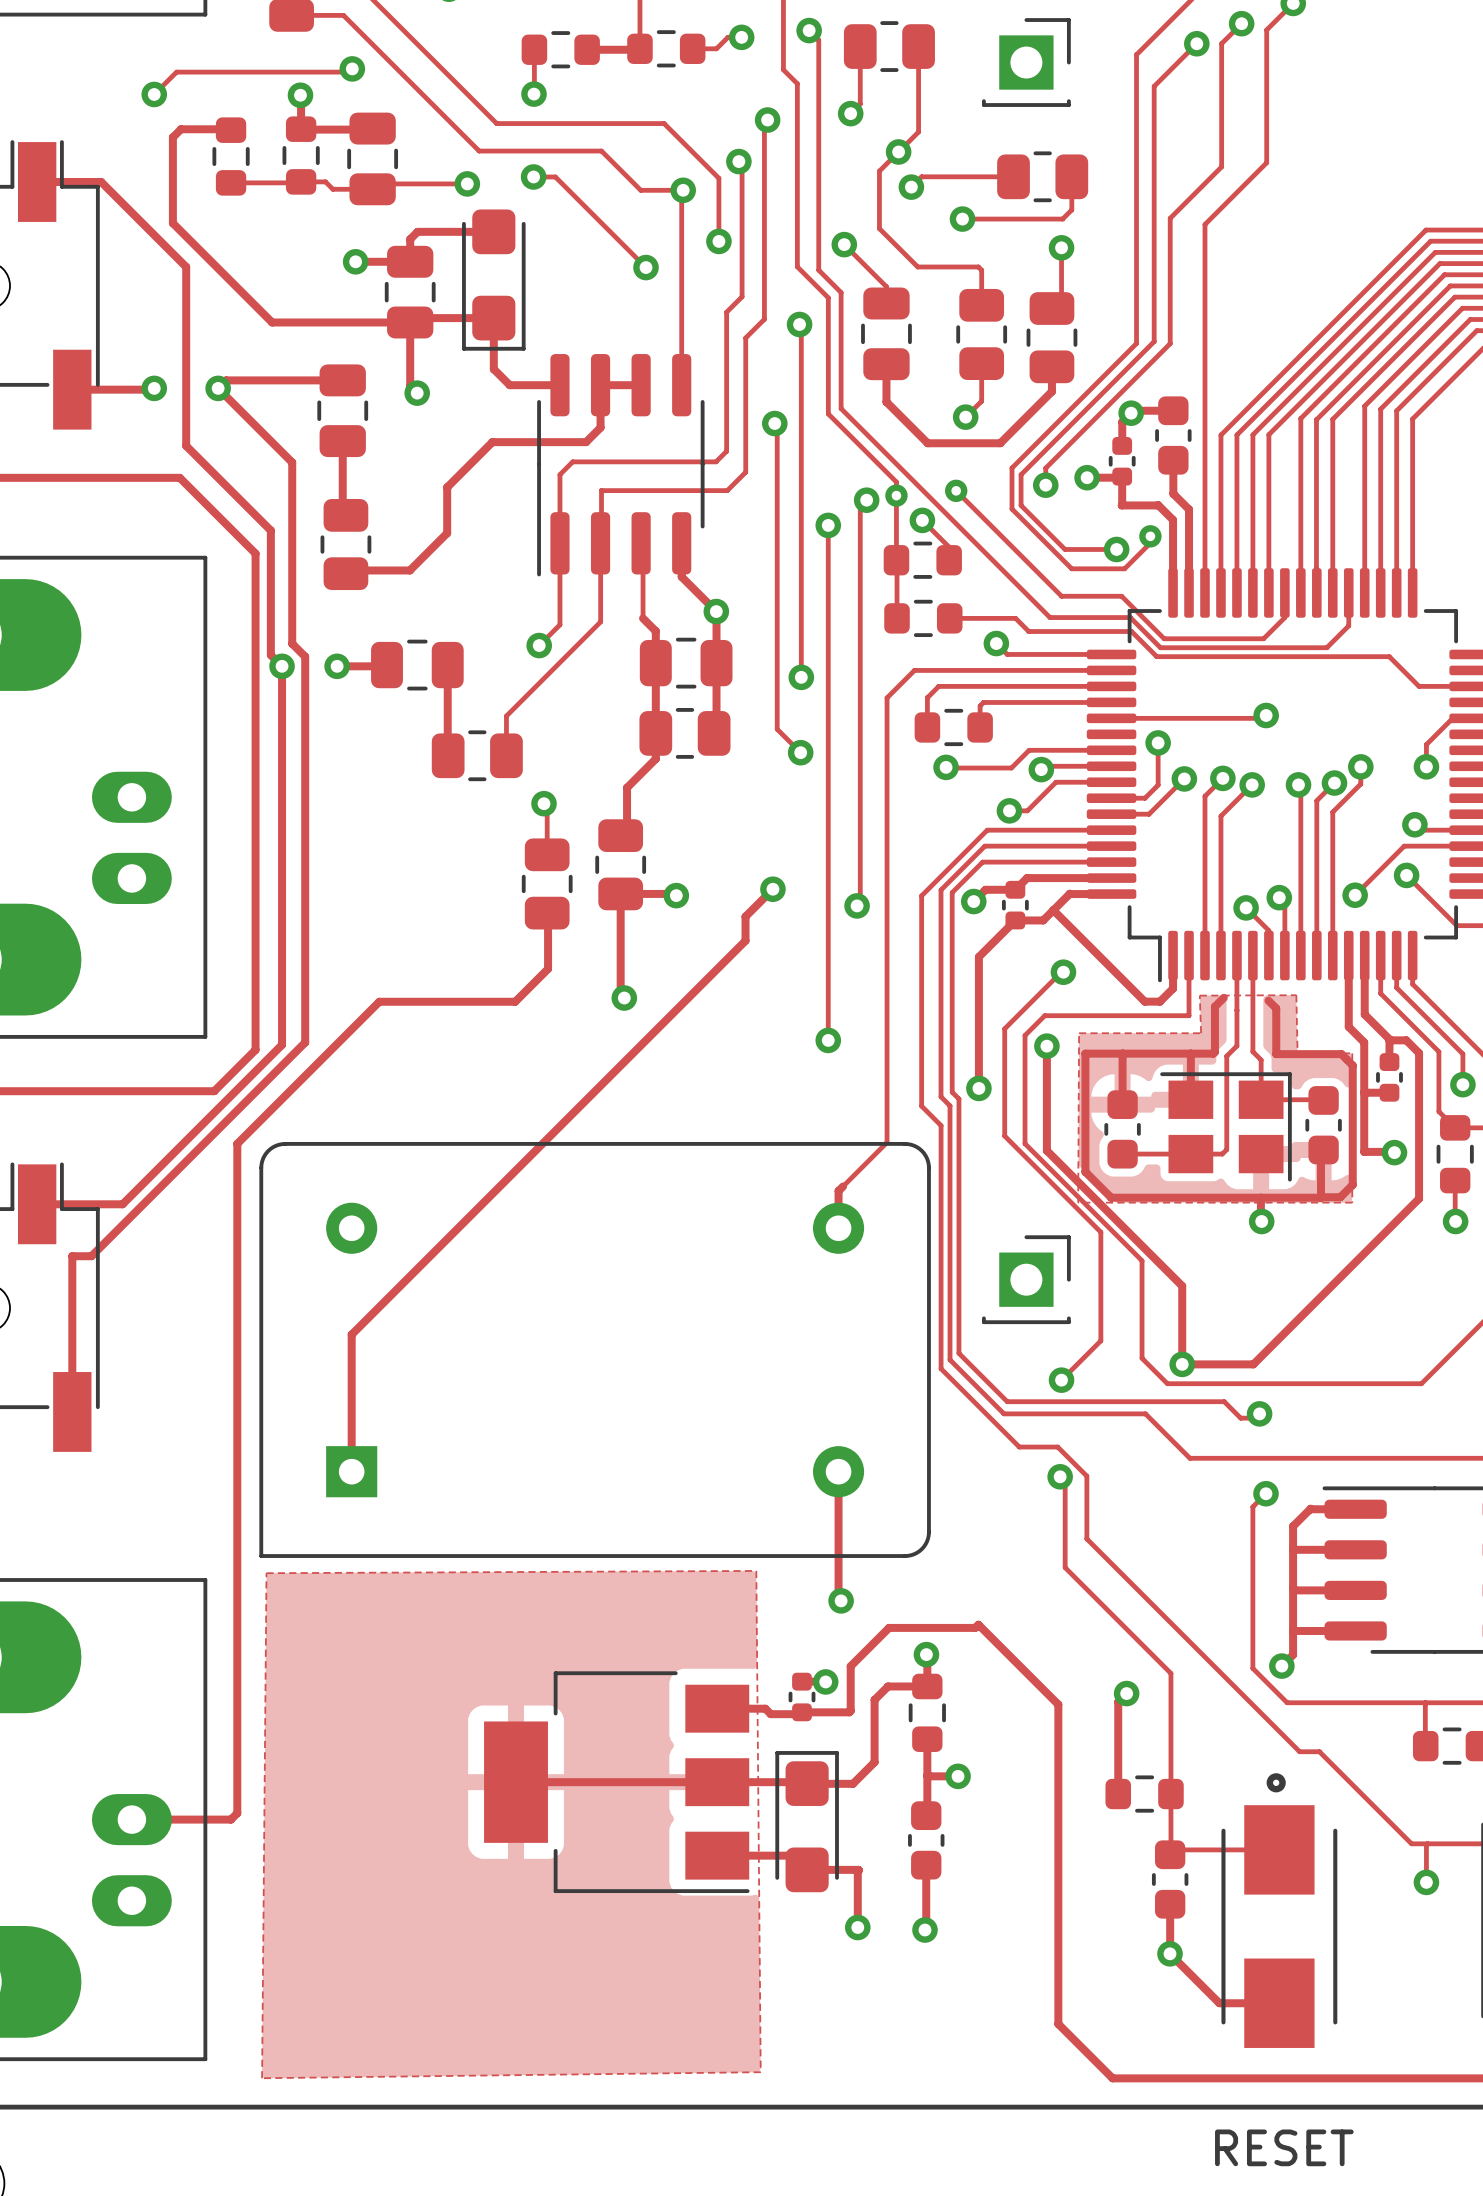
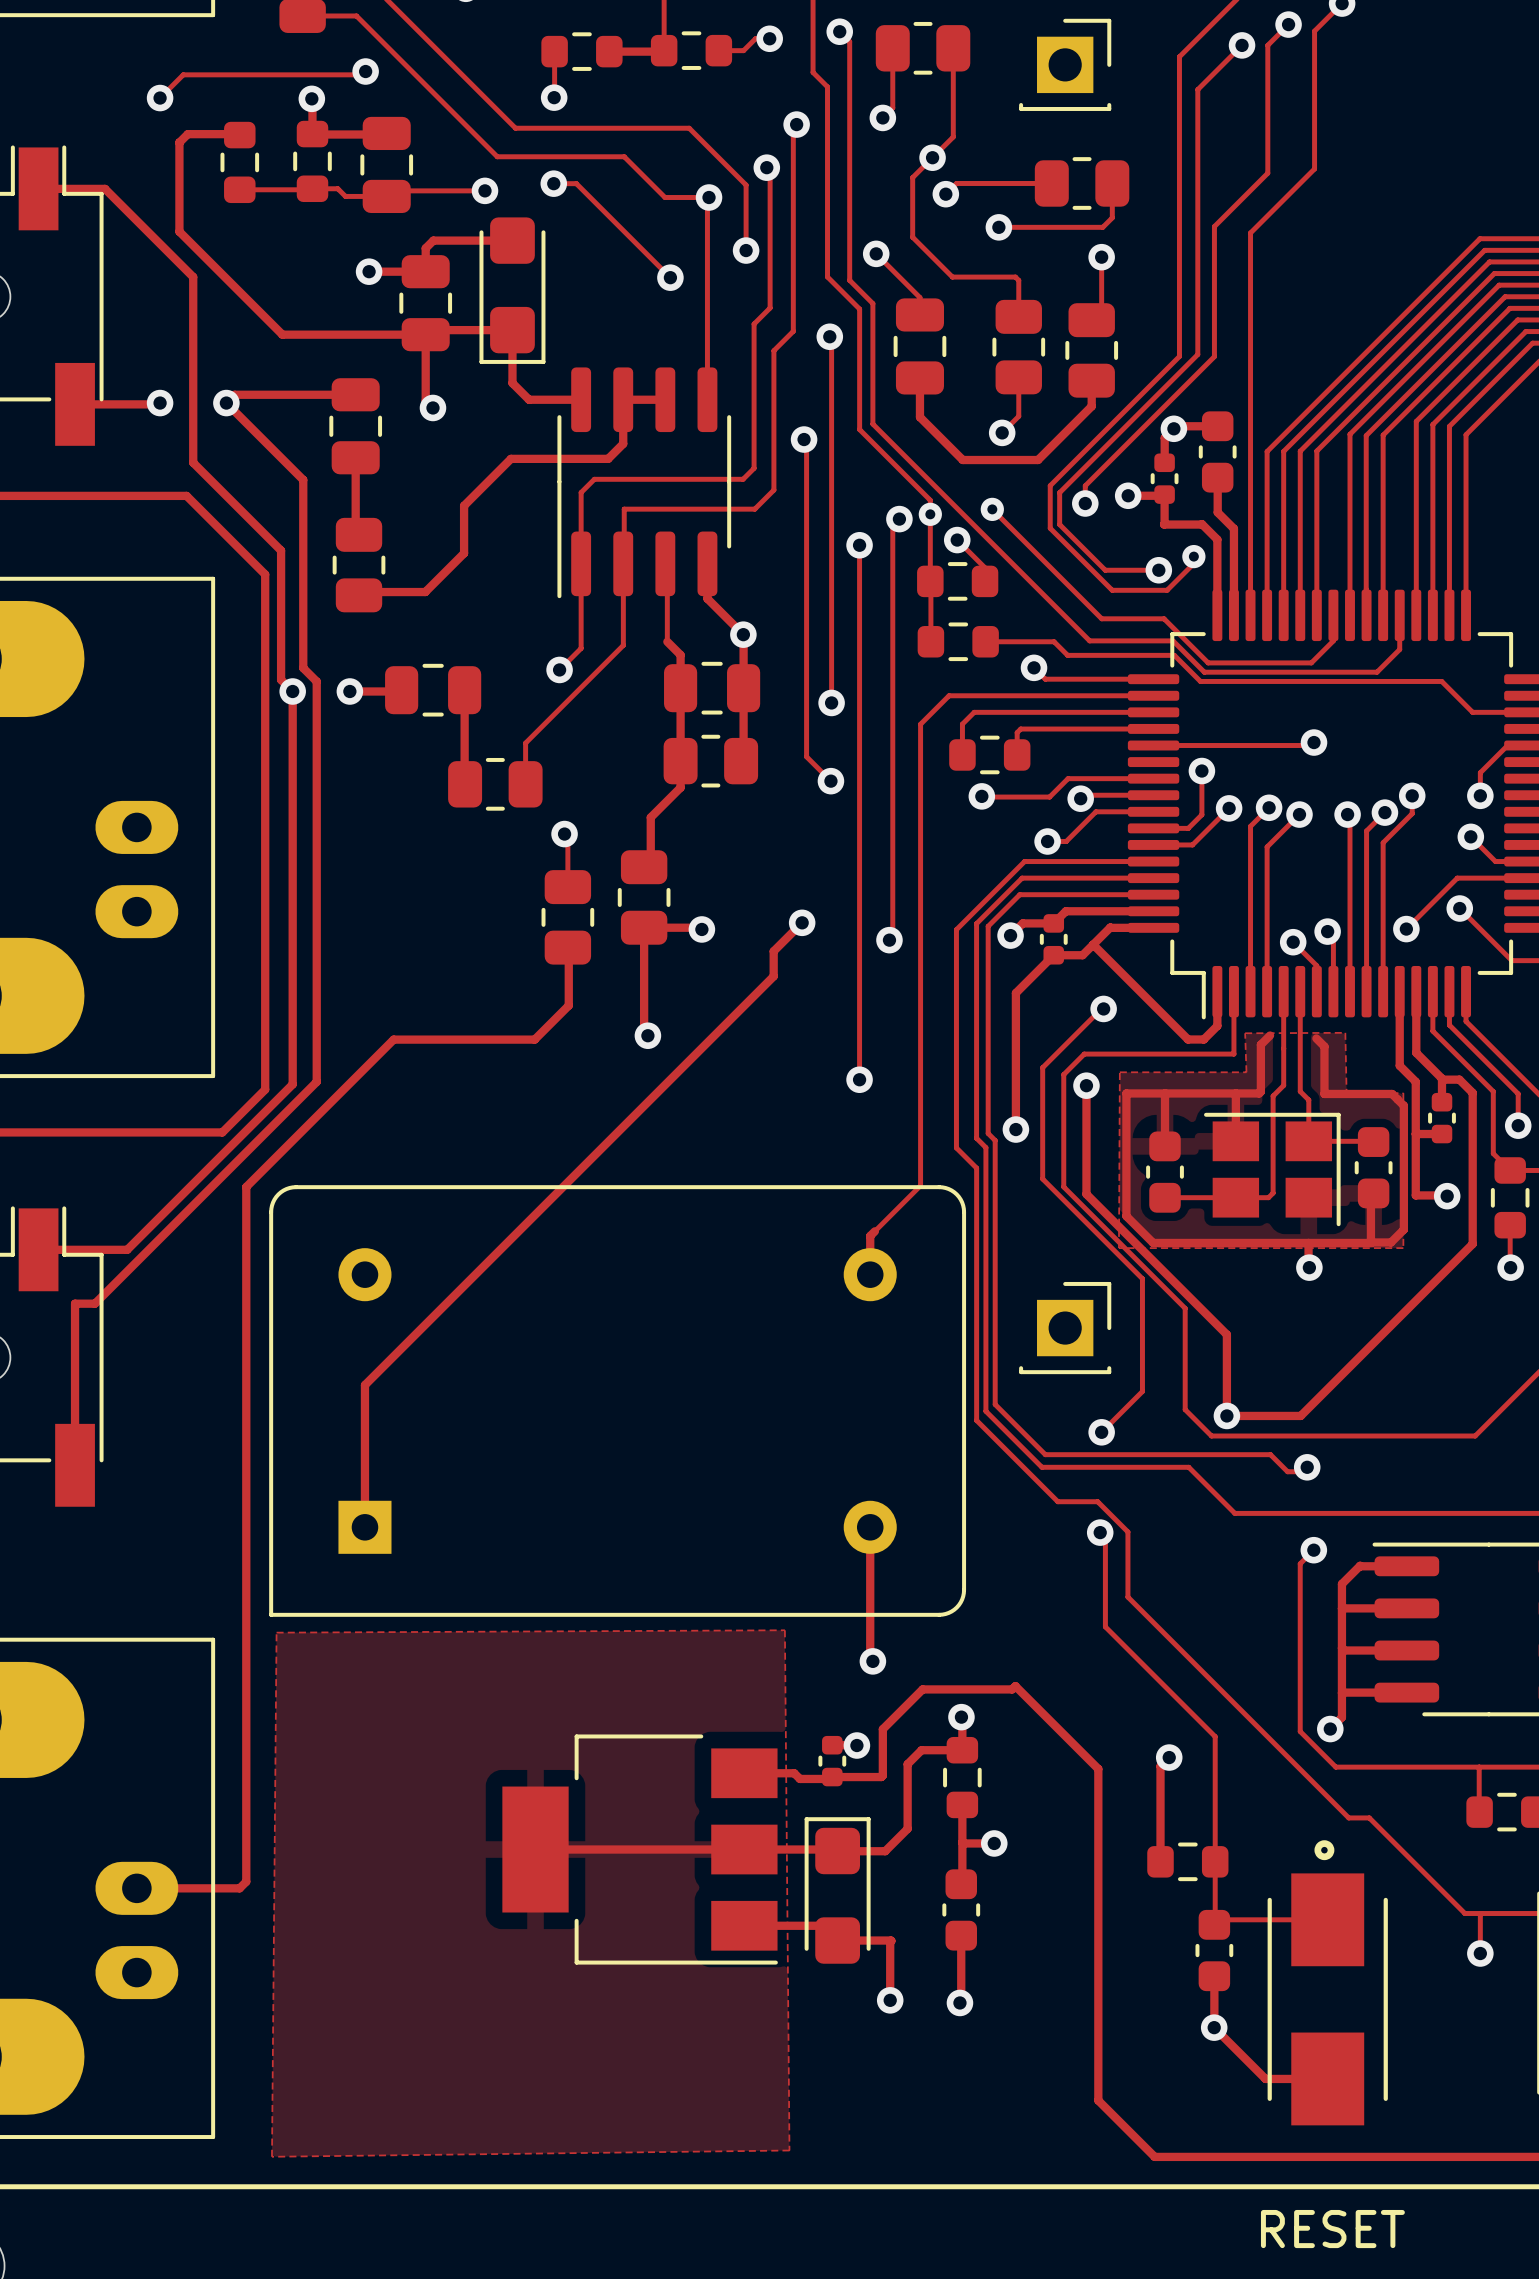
track: (1414, 824) (1420, 830) (1441, 830) -> (1470, 836) (1495, 861)
via position: (1414, 824) -> (1470, 836)

